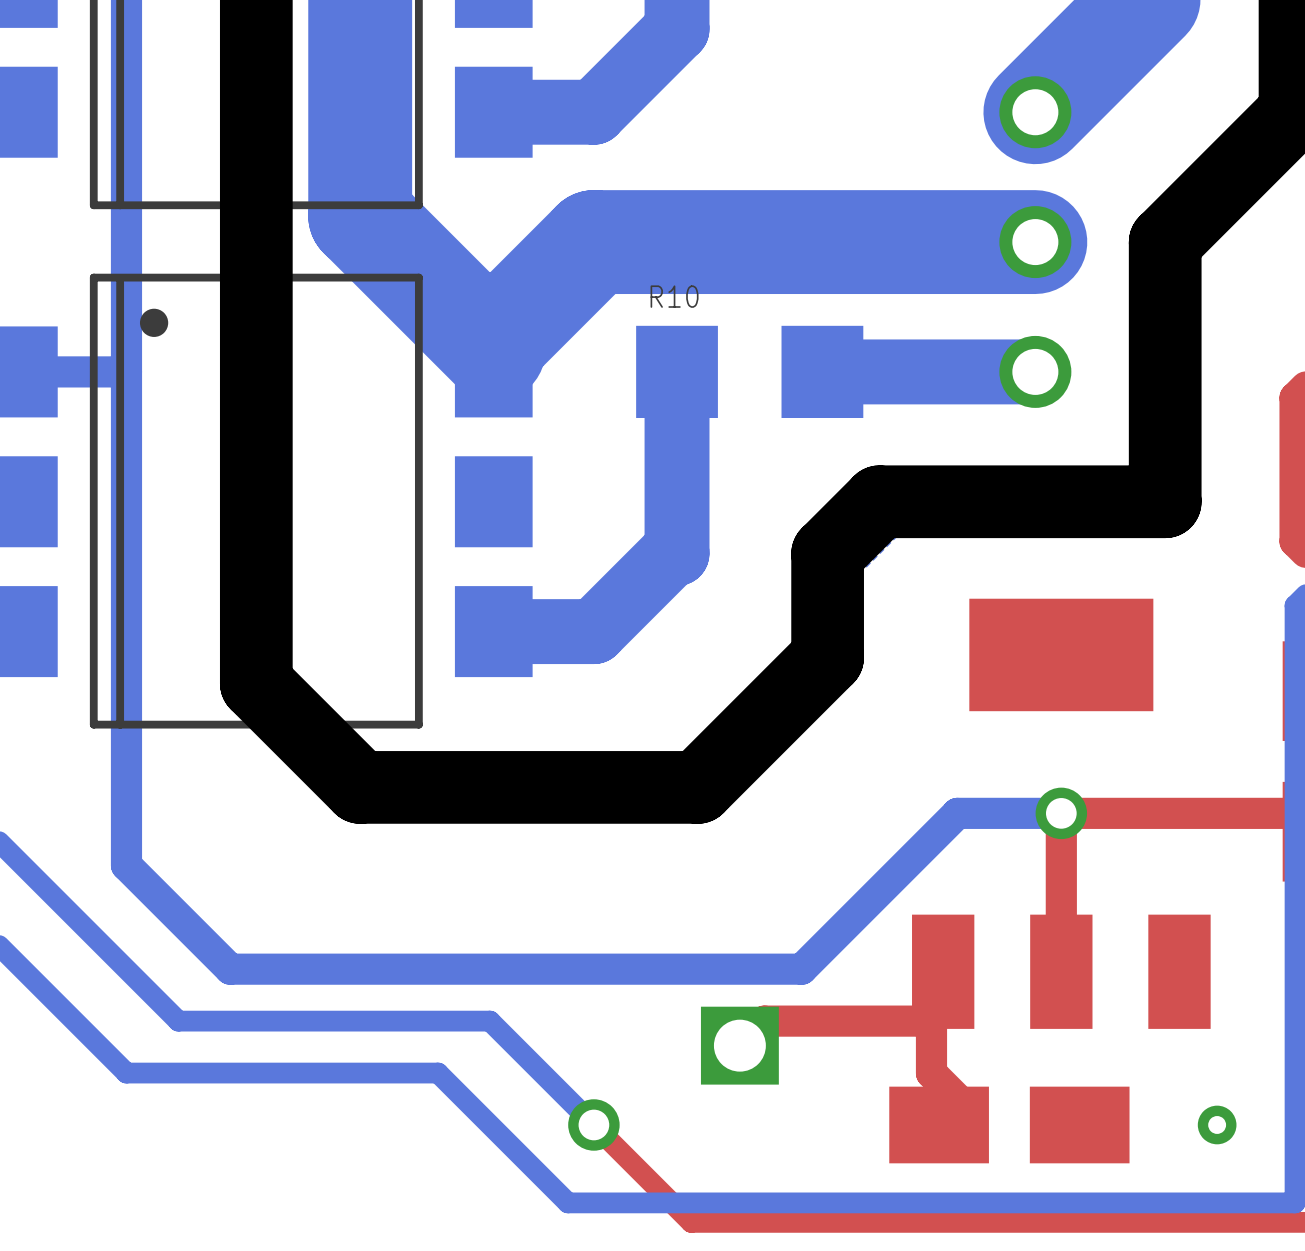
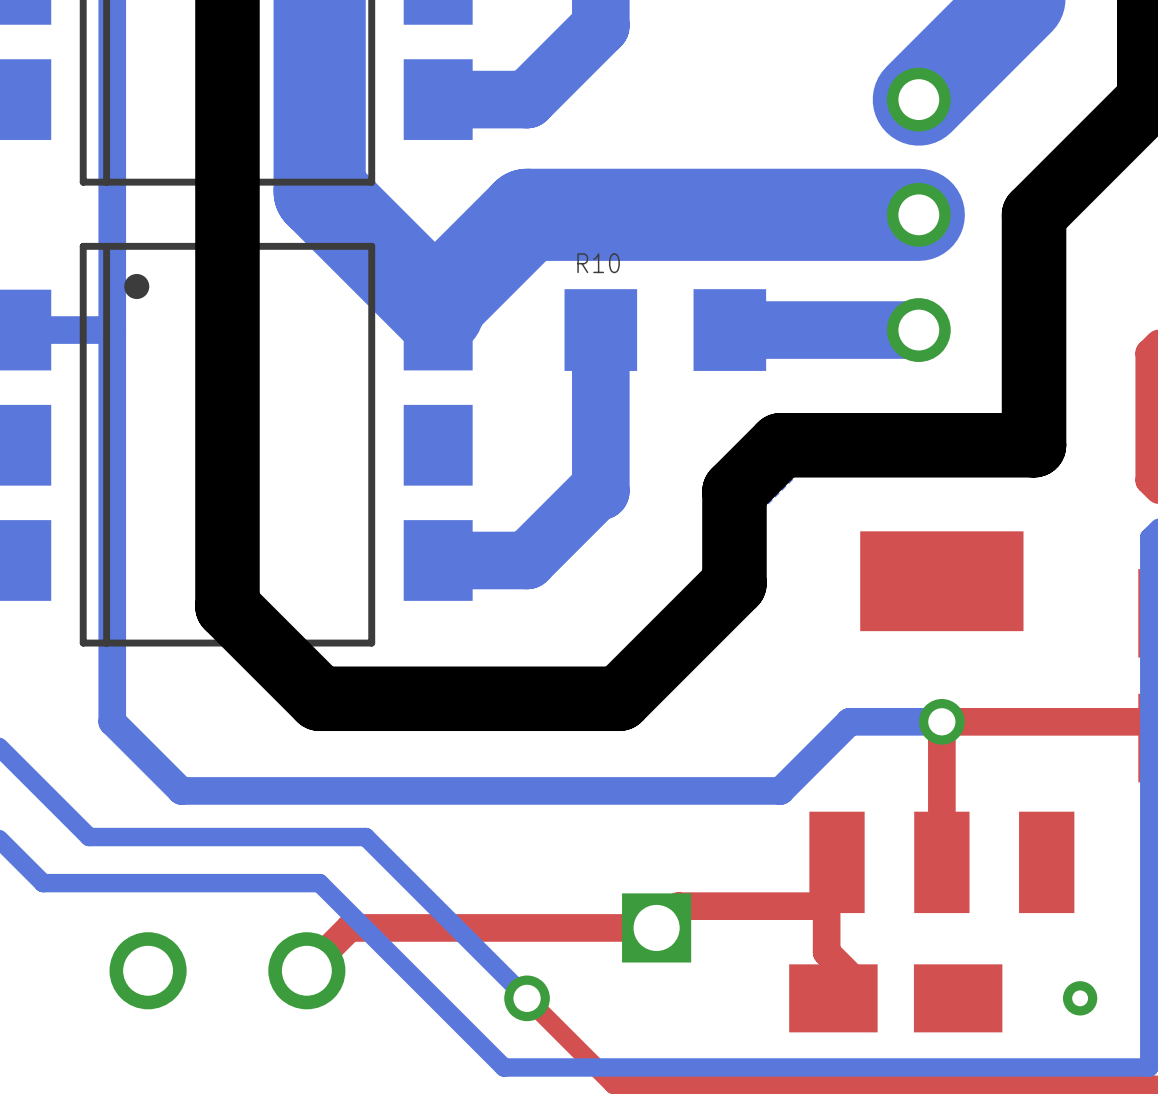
bottom track: (126, 813) (126, 865) (230, 969) (801, 969) (879, 891) -> (112, 721) (181, 790) (780, 790)
bottom track: (100, 943) (178, 1021) (490, 1021) -> (89, 837) (365, 837) (434, 906)
bottom track: (48, 995) (126, 1073) (438, 1073) -> (43, 883) (319, 883) (388, 952)
top track: none -> (656, 927) (349, 927) (306, 970)
part: none -> (227, 970)

